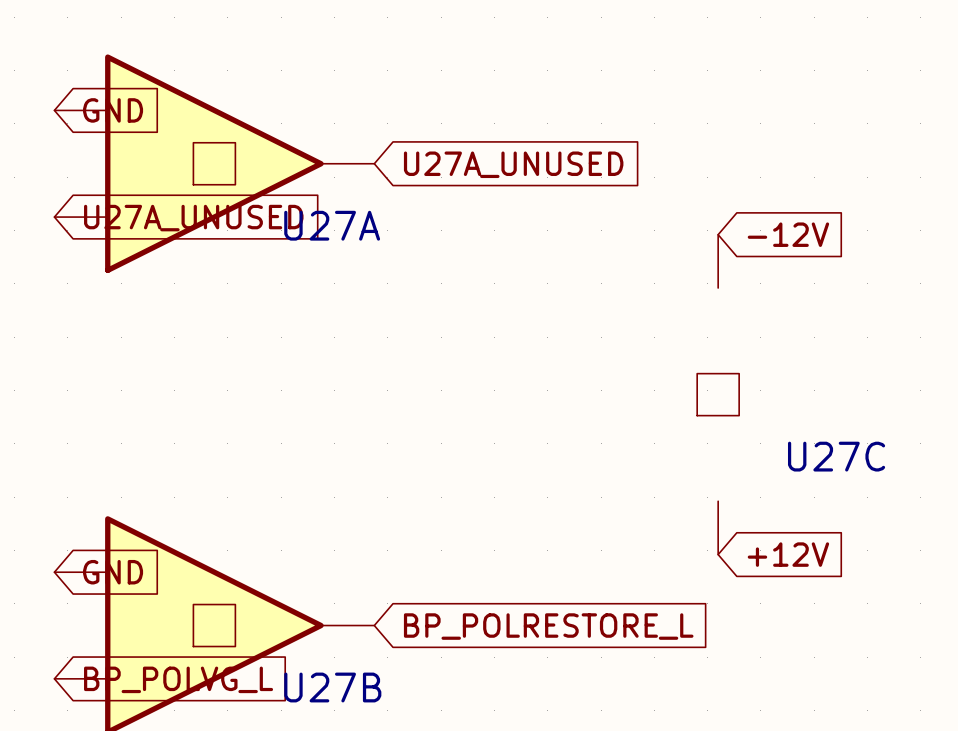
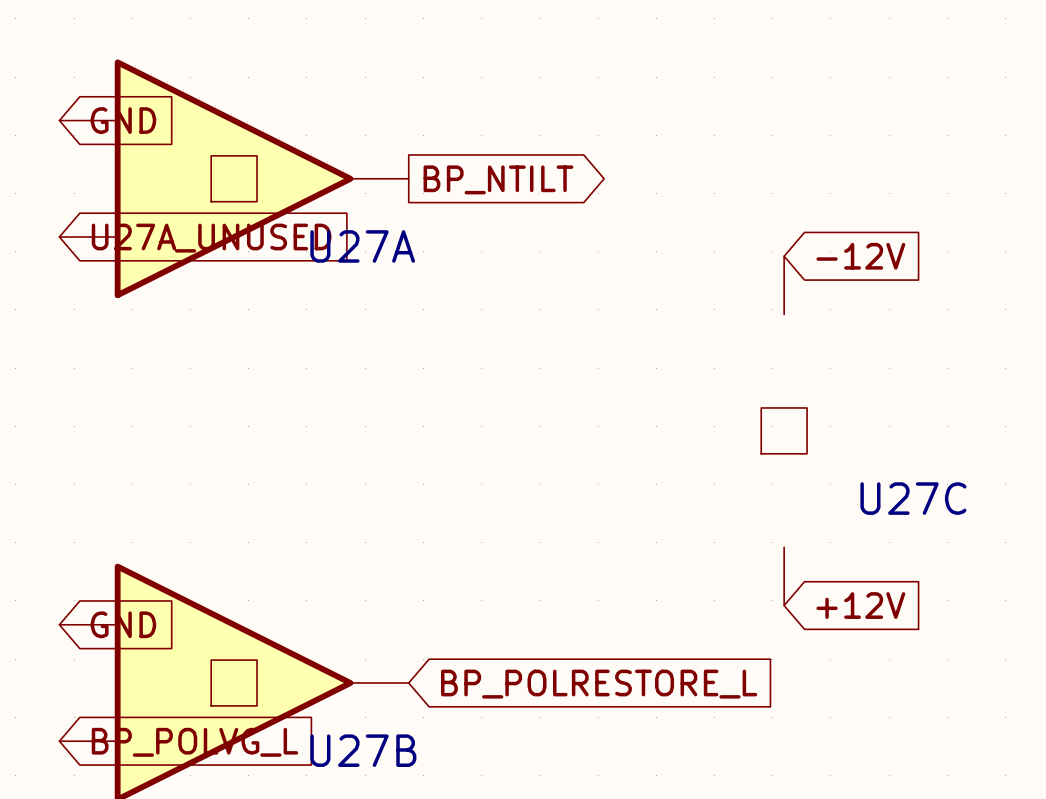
global label shape: input (513, 164) -> output (498, 179)
global label: U27A_UNUSED (513, 164) -> BP_NTILT (498, 179)

